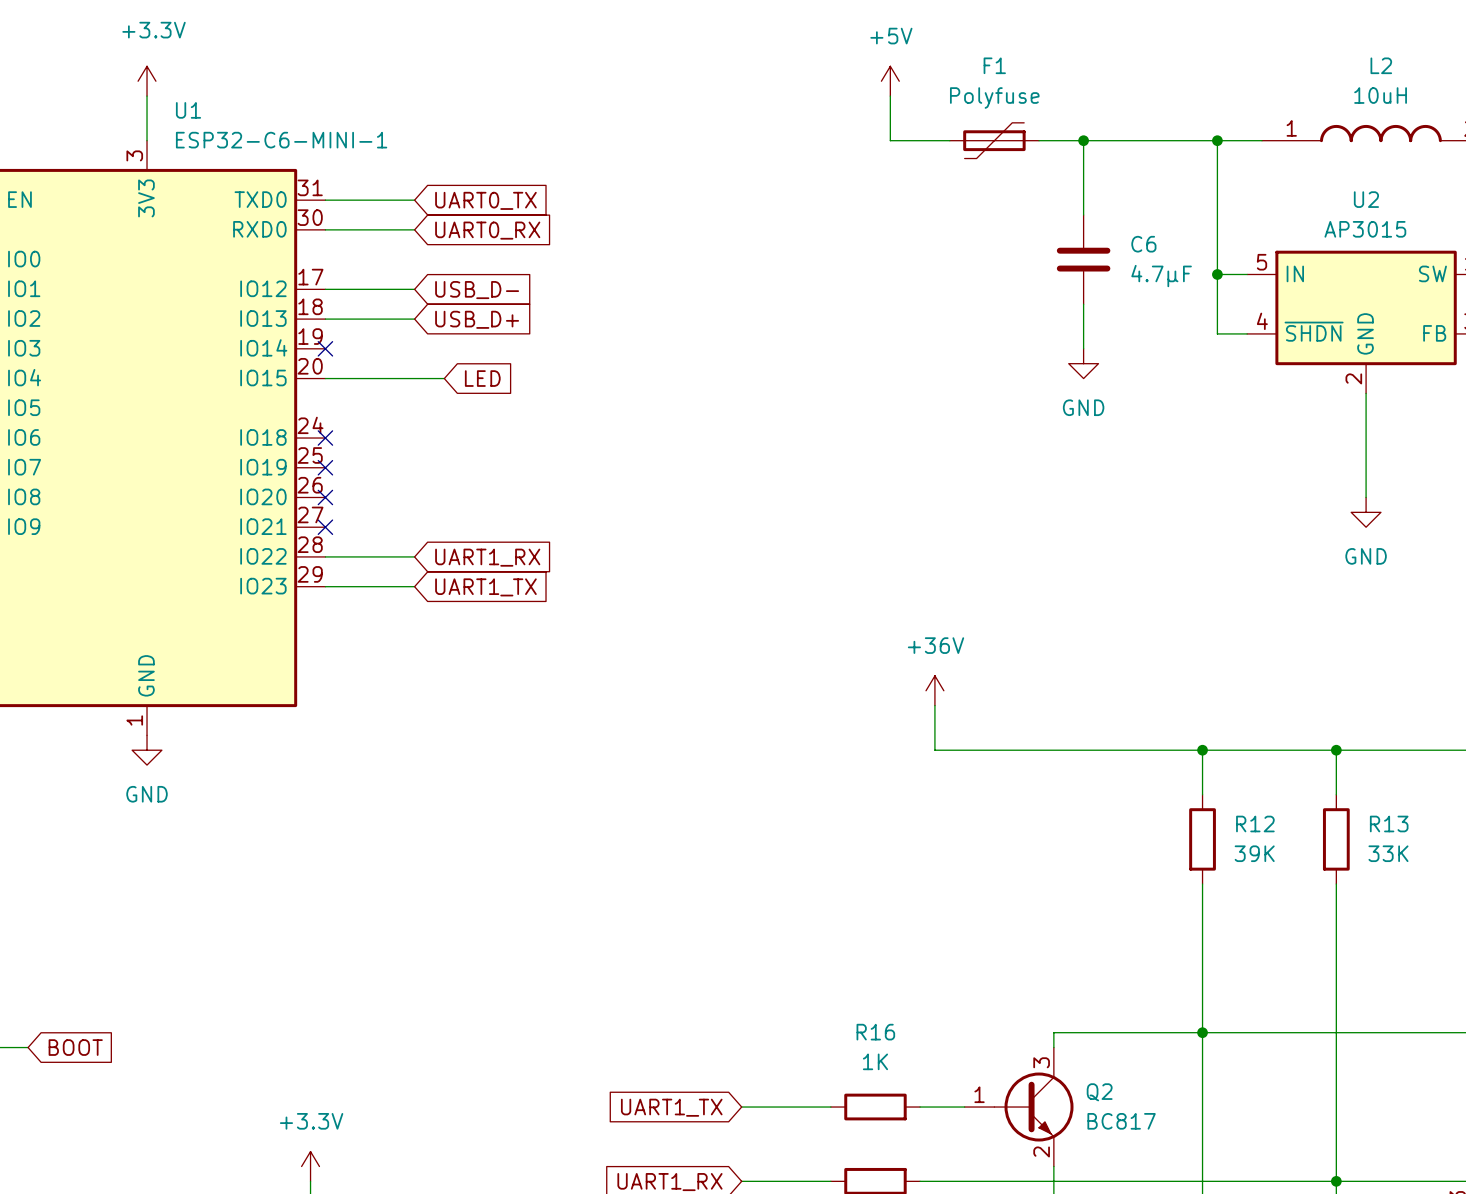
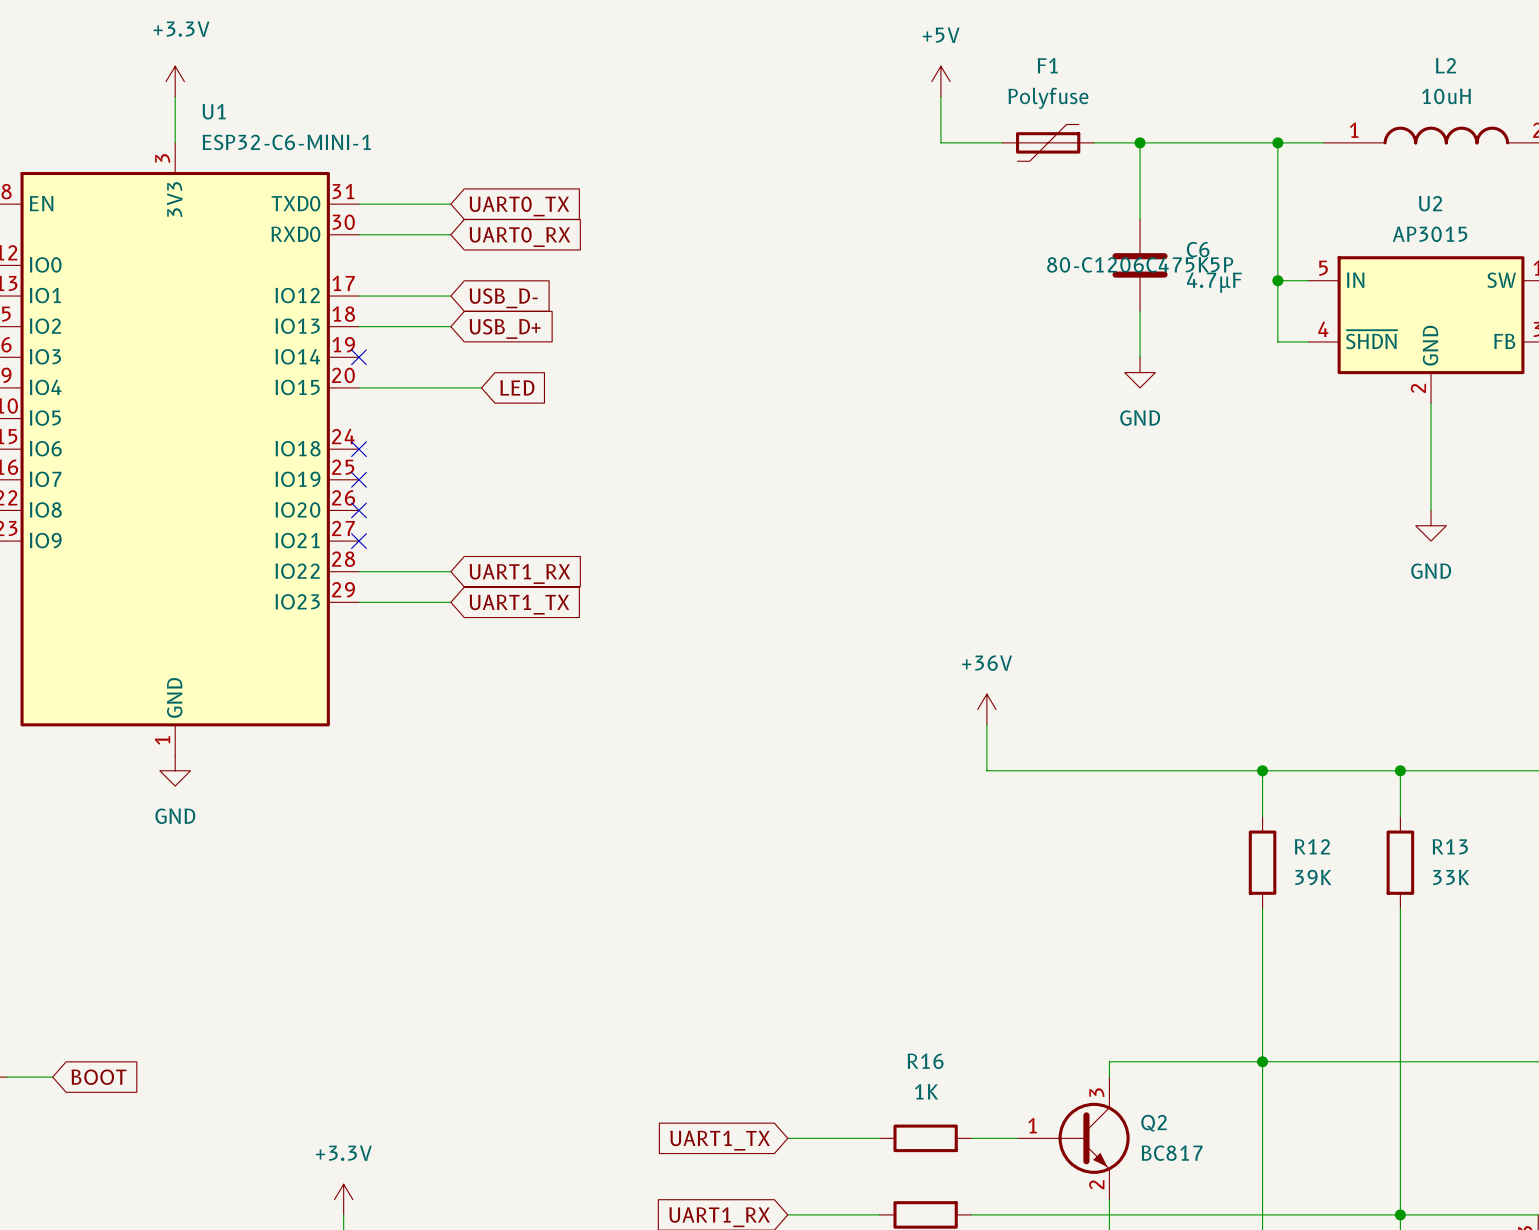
C6 text: none -> 80-C1206C475K5P (1140, 264)

